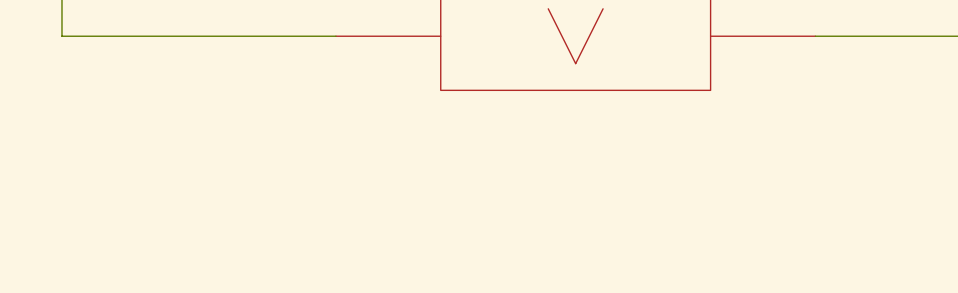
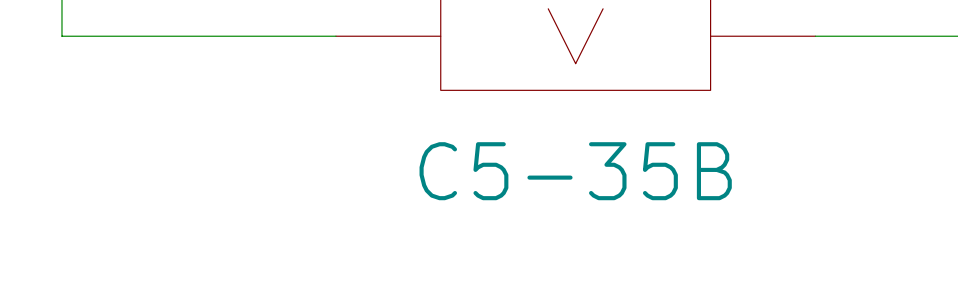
part text: none -> C5-35В (575, 171)

